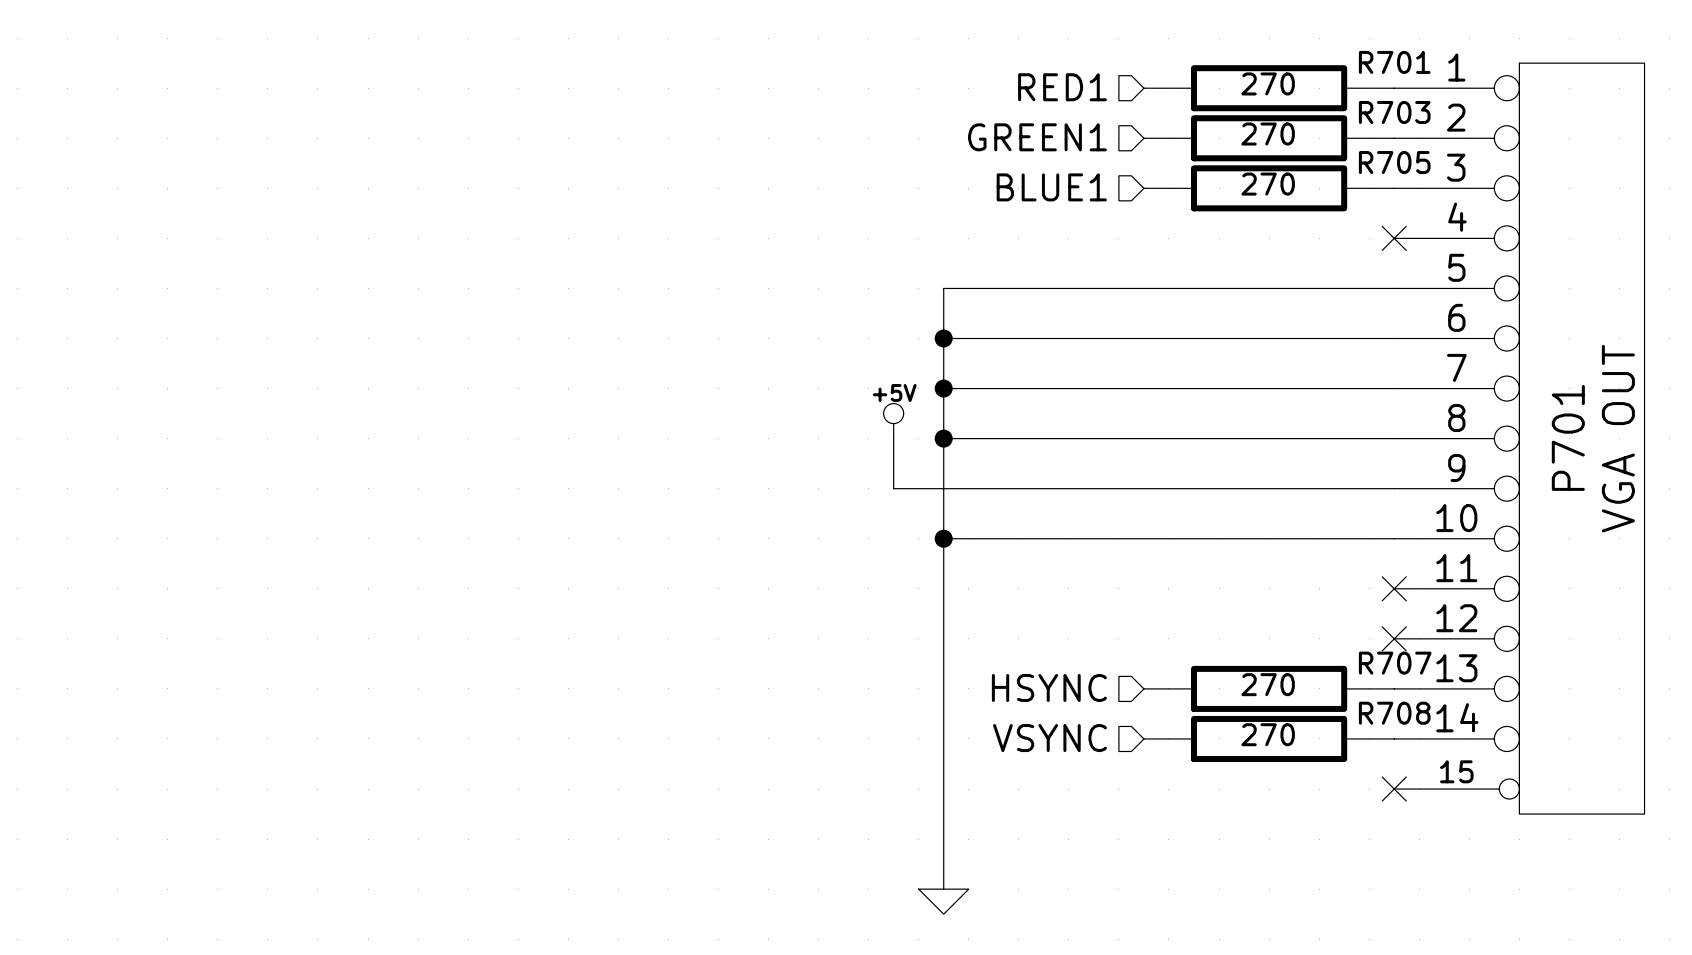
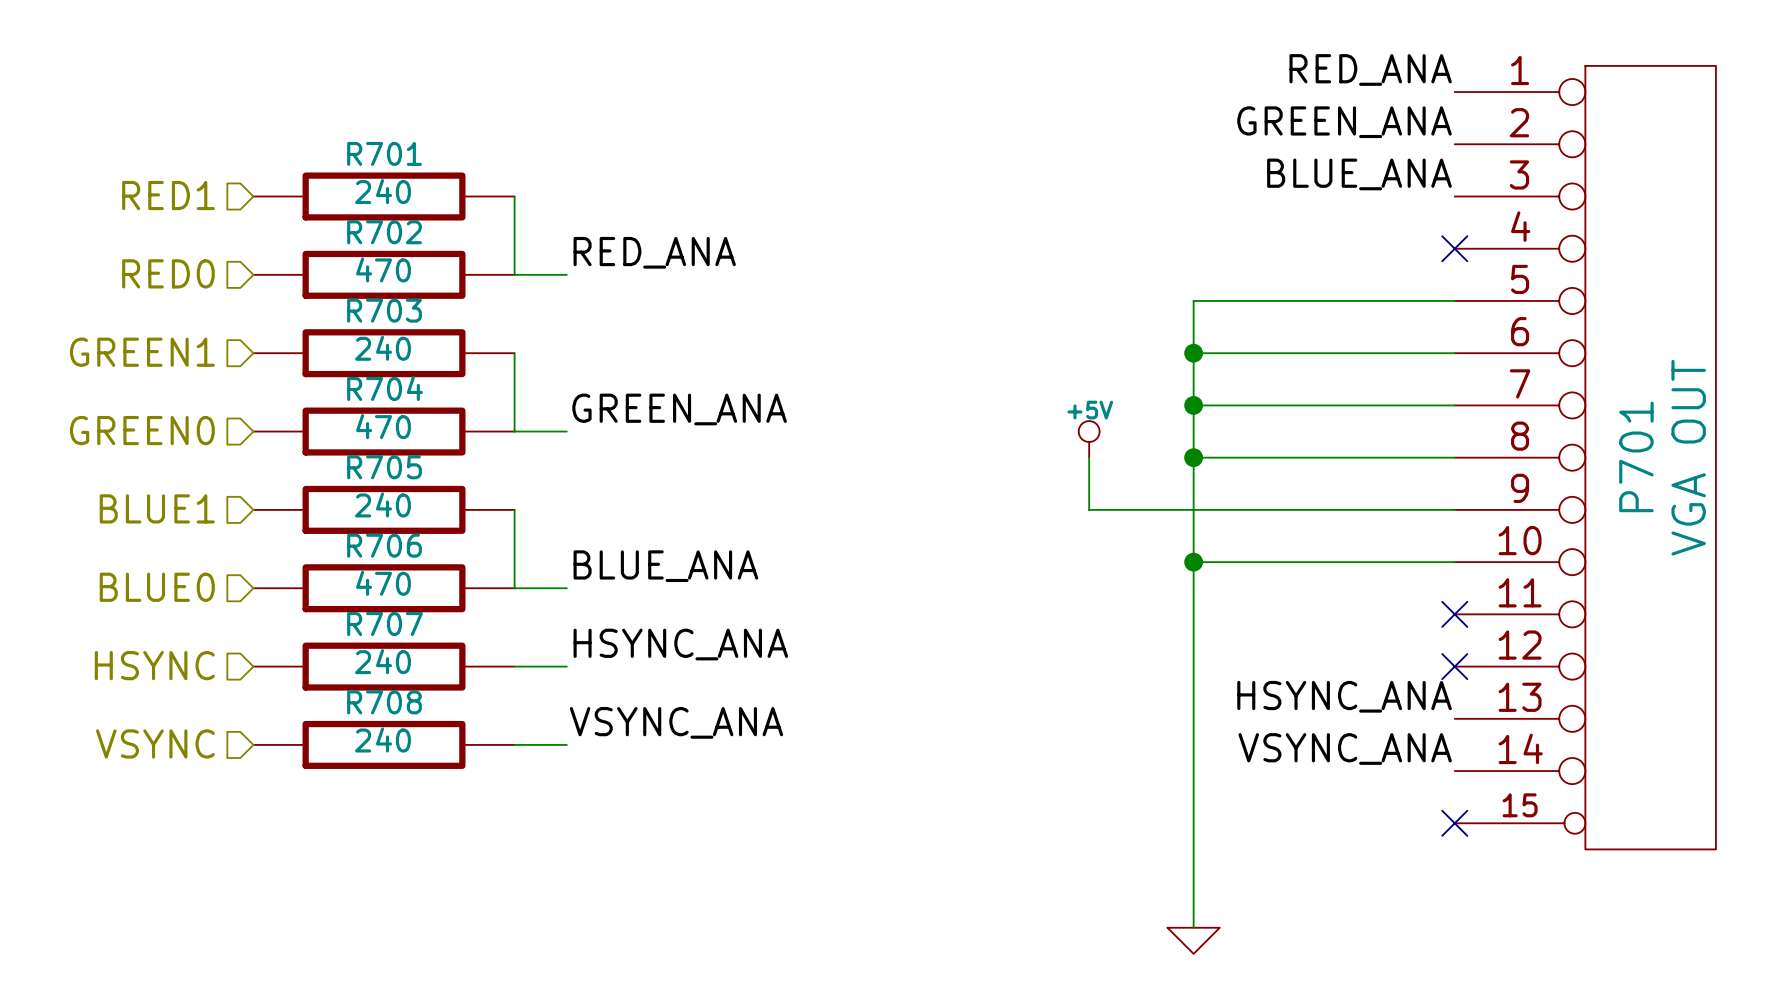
R701 name position: R701 (1394, 62) -> R701 (384, 153)
label: none -> RED_ANA (1370, 69)
R701 value: 270 (1268, 83) -> 240 (383, 191)
hierarchical label: RED1 (1062, 87) -> none
R701 position: (1269, 88) -> (384, 196)
R703 name position: R703 (1394, 112) -> R703 (384, 310)
label: none -> GREEN_ANA (1344, 122)
R703 value: 270 (1268, 134) -> 240 (383, 348)
hierarchical label: GREEN1 (1037, 137) -> none
R703 position: (1269, 138) -> (384, 353)
R705 name position: R705 (1394, 162) -> R705 (384, 467)
label: none -> BLUE_ANA (1359, 174)
R705 value: 270 (1268, 184) -> 240 (383, 504)
hierarchical label: none -> RED1 (168, 195)
hierarchical label: BLUE1 (1051, 187) -> none
wire: none -> (514, 196) (514, 274) (566, 274)
R705 position: (1269, 188) -> (384, 509)
label: none -> RED_ANA (654, 252)
hierarchical label: none -> RED0 (168, 273)
R702: none -> 470 (384, 274)
wire: (1143, 288) (943, 288) (943, 889) -> (1193, 300) (1193, 927)
hierarchical label: none -> GREEN1 (142, 352)
wire: none -> (514, 353) (514, 431) (566, 431)
wire: (943, 338) (1143, 338) -> none
junction: (943, 338) -> none
junction: none -> (1193, 353)
wire: (943, 388) (1143, 388) -> none
junction: (943, 388) -> none
junction: none -> (1193, 405)
label: none -> GREEN_ANA (679, 409)
hierarchical label: none -> GREEN0 (142, 430)
R704: none -> 470 (384, 431)
power symbol position: +5V (893, 421) -> +5V (1089, 439)
wire: (893, 438) (893, 488) (1043, 488) -> (1089, 457) (1089, 509)
wire: (943, 438) (1143, 438) -> none
junction: (943, 438) -> none
junction: none -> (1193, 457)
hierarchical label: none -> BLUE1 (157, 508)
wire: none -> (514, 509) (514, 588) (566, 588)
wire: (943, 538) (1143, 538) -> none
junction: (943, 538) -> none
junction: none -> (1193, 562)
label: none -> BLUE_ANA (665, 566)
hierarchical label: none -> BLUE0 (157, 587)
R706: none -> 470 (384, 588)
label: none -> HSYNC_ANA (680, 644)
hierarchical label: none -> HSYNC (154, 665)
wire: none -> (514, 666) (566, 666)
R707 name position: R707 (1395, 663) -> R707 (385, 624)
label: none -> HSYNC_ANA (1344, 696)
R707 value: 270 (1268, 684) -> 240 (383, 661)
hierarchical label: HSYNC (1049, 687) -> none
R707 position: (1269, 688) -> (384, 666)
label: none -> VSYNC_ANA (676, 722)
hierarchical label: none -> VSYNC (155, 743)
wire: none -> (514, 744) (566, 744)
R708 name position: R708 (1394, 713) -> R708 (384, 702)
label: none -> VSYNC_ANA (1345, 749)
R708 value: 270 (1268, 734) -> 240 (383, 740)
hierarchical label: VSYNC (1049, 738) -> none
R708 position: (1269, 738) -> (384, 744)
power symbol position: (943, 901) -> (1193, 940)

